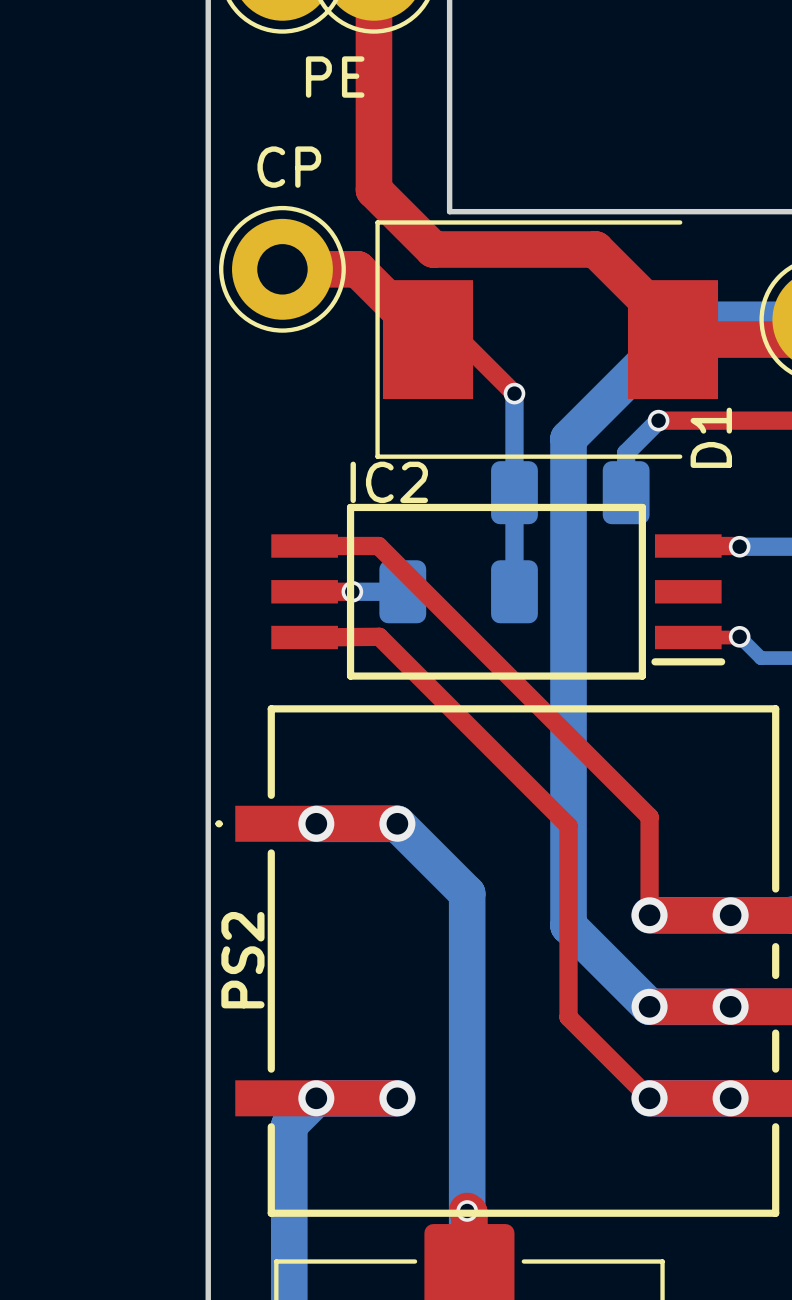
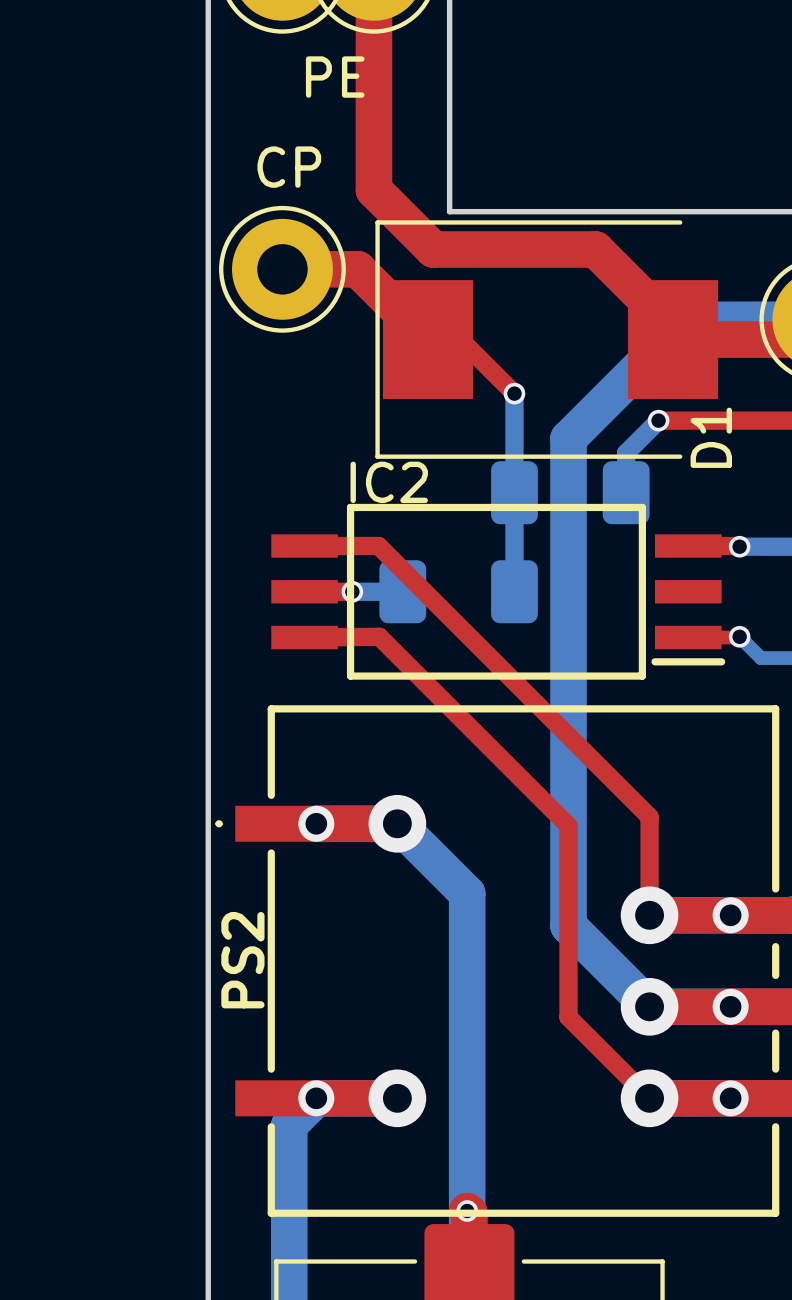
via size: [379, 805, 416, 842] -> [368, 794, 427, 853]
via size: [631, 897, 668, 934] -> [620, 886, 679, 945]
via size: [631, 988, 668, 1025] -> [620, 977, 679, 1036]
via size: [379, 1080, 416, 1117] -> [368, 1069, 427, 1128]
via size: [631, 1080, 668, 1117] -> [620, 1069, 679, 1128]

